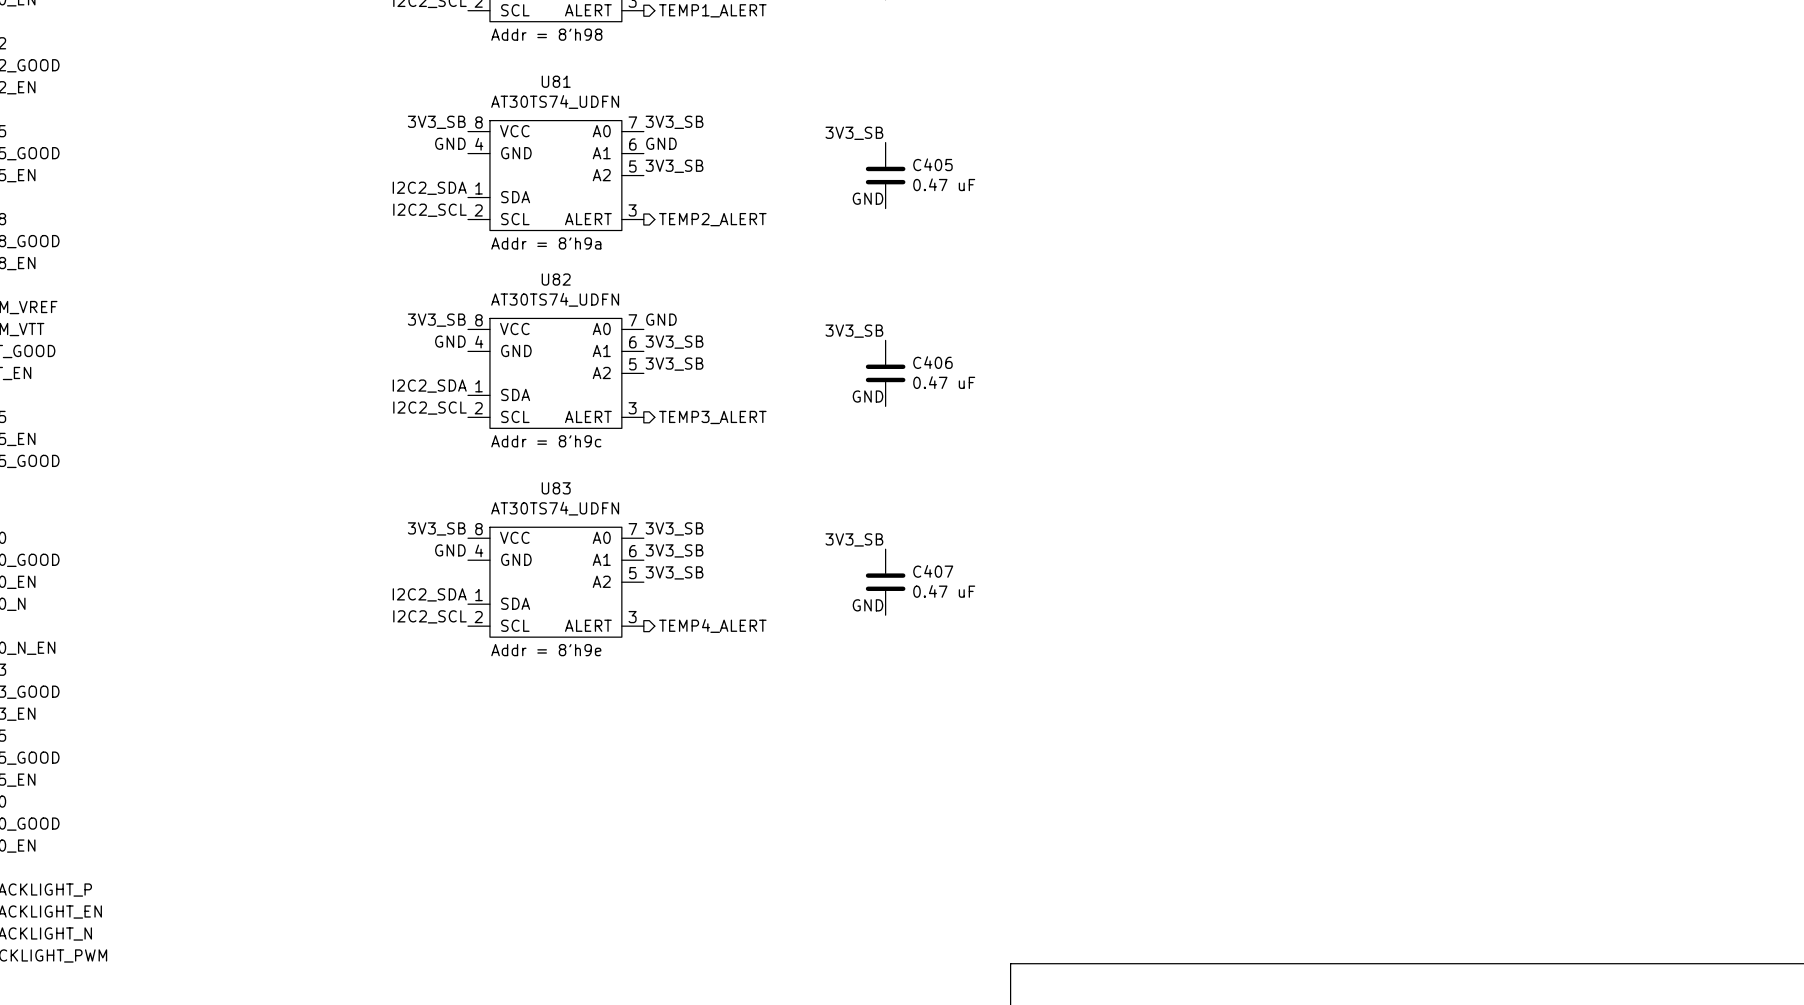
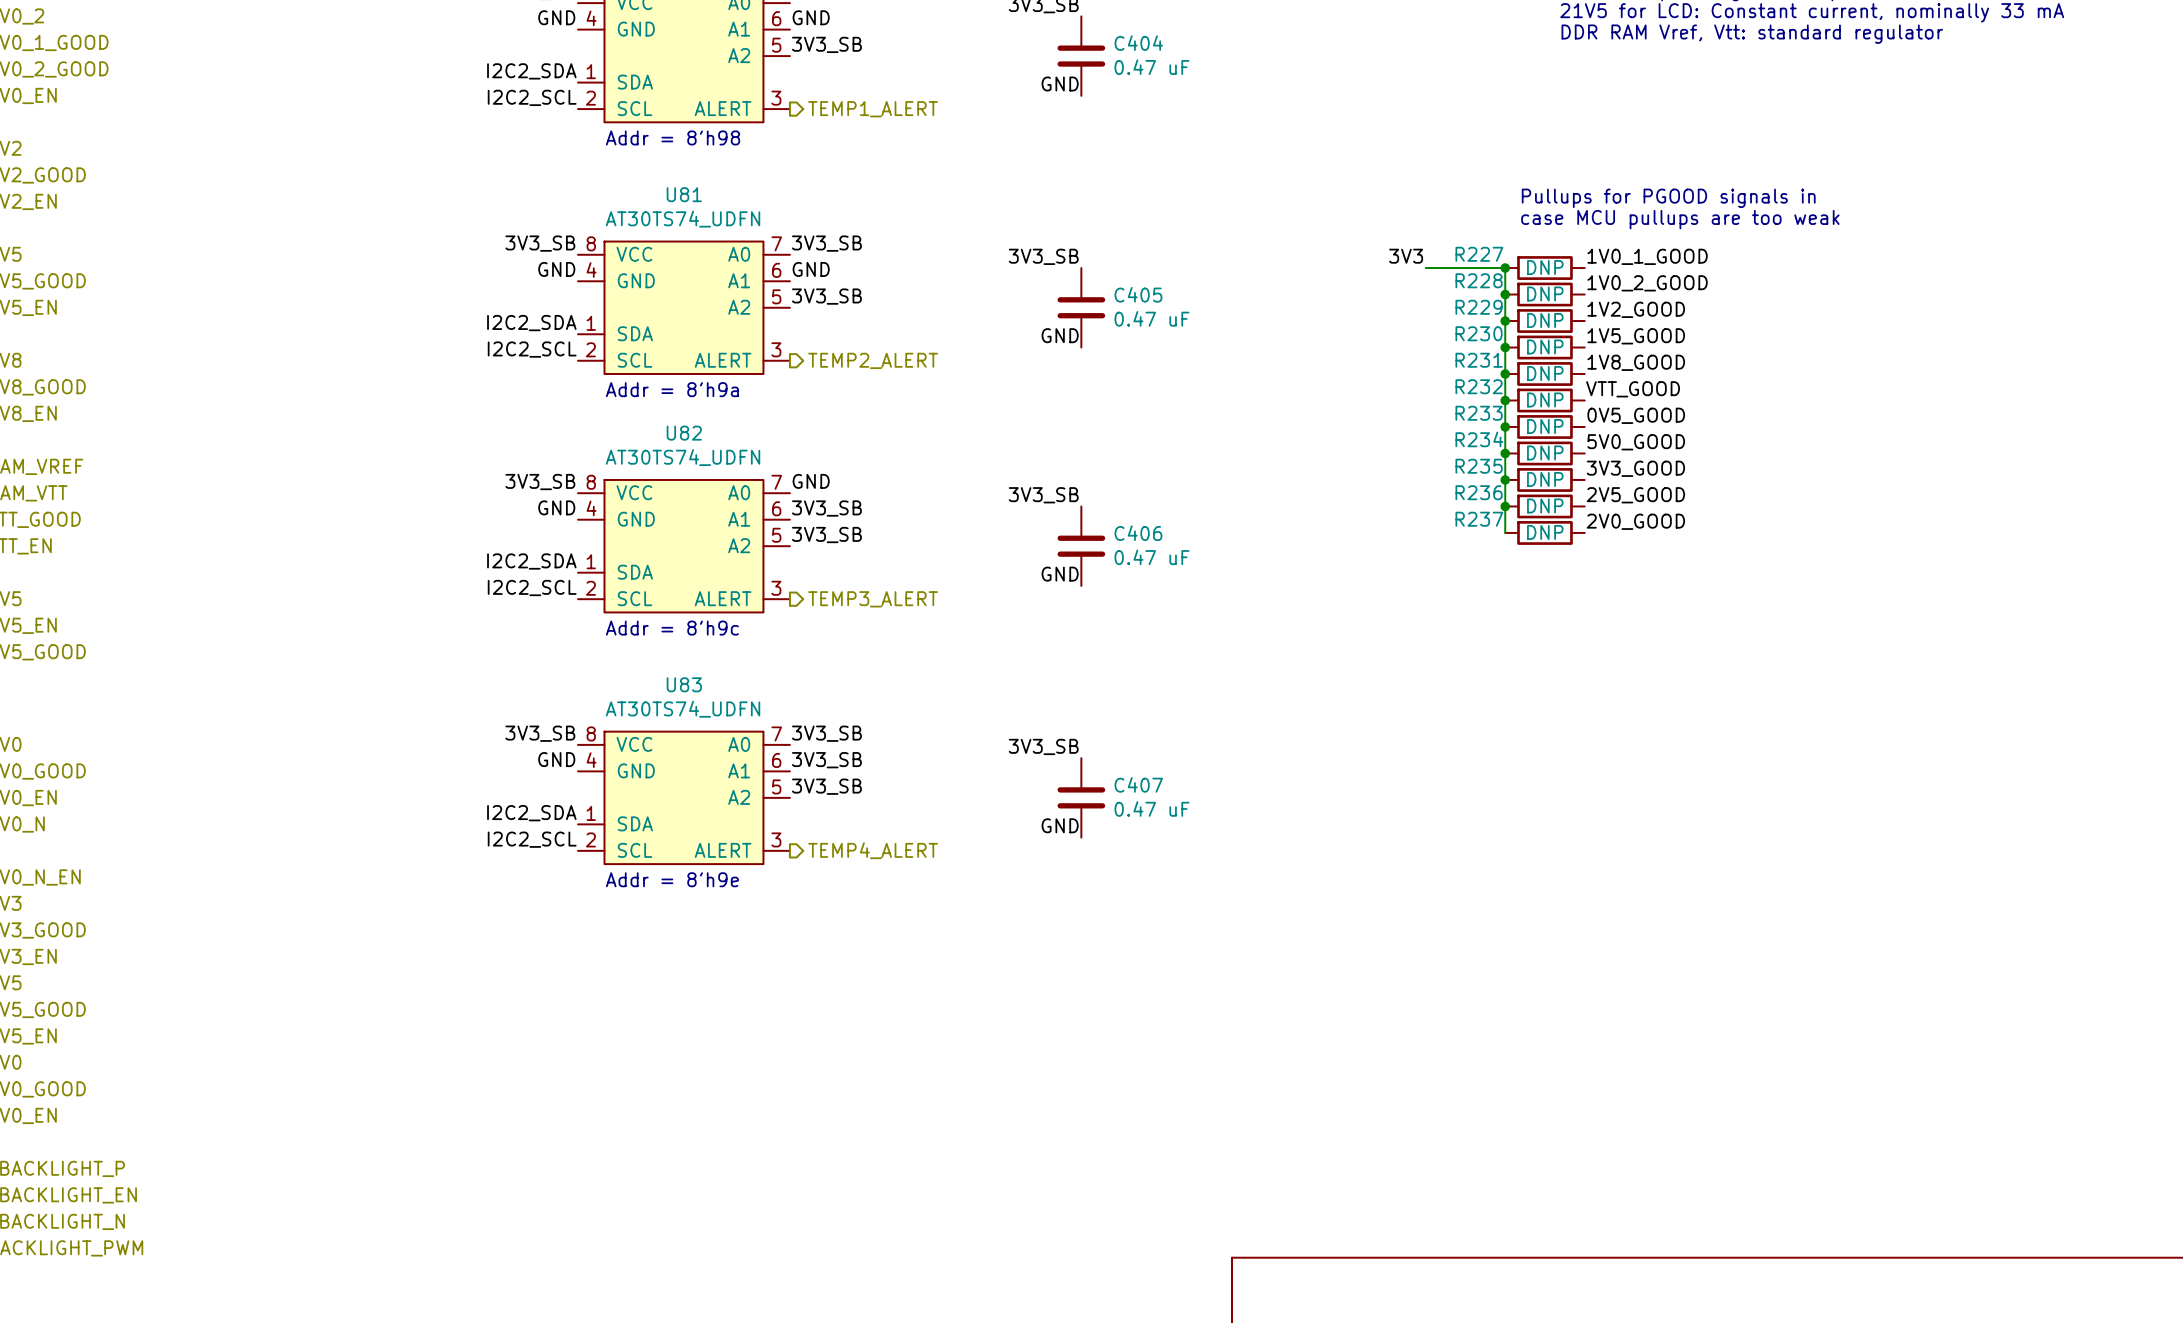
text: none -> Pullups for PGOOD signals in (1668, 198)
text: none -> case MCU pullups are too weak (1680, 219)
label: none -> 3V3 (1406, 256)
label: none -> 1V0_1_GOOD (1647, 256)
wire: none -> (1425, 268) (1505, 268) (1505, 532)
junction: none -> (1505, 268)
R227: none -> DNP (1544, 268)
label: none -> 1V0_2_GOOD (1647, 283)
junction: none -> (1505, 294)
R228: none -> DNP (1544, 294)
label: none -> 1V2_GOOD (1636, 309)
junction: none -> (1505, 321)
R229: none -> DNP (1544, 321)
label: none -> 1V5_GOOD (1636, 336)
junction: none -> (1505, 347)
R230: none -> DNP (1544, 347)
label: none -> 1V8_GOOD (1636, 362)
junction: none -> (1505, 374)
R231: none -> DNP (1544, 374)
label: none -> VTT_GOOD (1633, 389)
junction: none -> (1505, 400)
R232: none -> DNP (1544, 400)
label: none -> 0V5_GOOD (1636, 415)
junction: none -> (1505, 426)
R233: none -> DNP (1544, 426)
label: none -> 5V0_GOOD (1636, 442)
junction: none -> (1505, 453)
R234: none -> DNP (1544, 453)
label: none -> 3V3_GOOD (1635, 468)
junction: none -> (1505, 479)
R235: none -> DNP (1544, 479)
label: none -> 2V5_GOOD (1635, 495)
junction: none -> (1505, 506)
R236: none -> DNP (1544, 506)
label: none -> 2V0_GOOD (1635, 521)
R237: none -> DNP (1544, 532)

